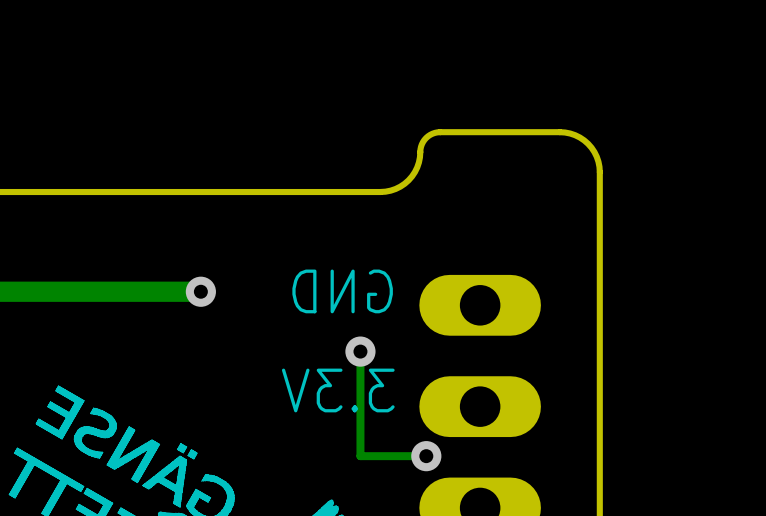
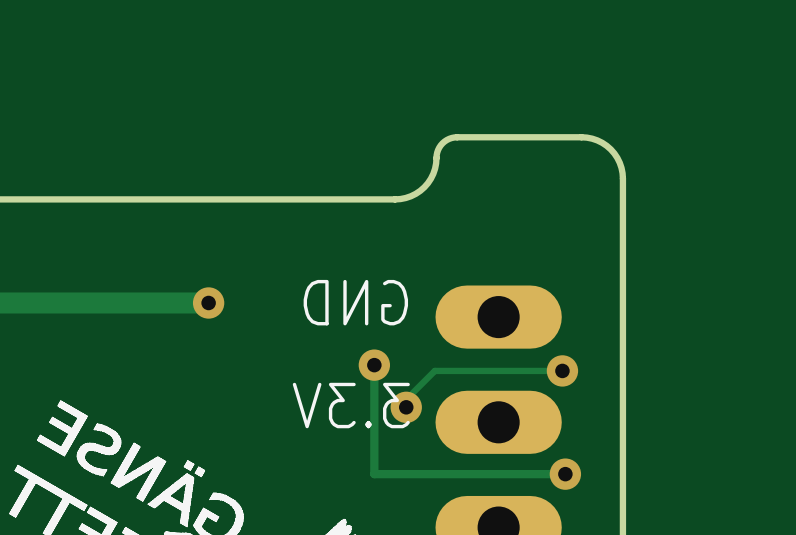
track: none -> (562, 370) (434, 370) (406, 399) (406, 407)
via: none -> (562, 370)
via: none -> (406, 407)
track: (426, 456) (360, 456) -> (565, 474) (374, 474)
via: (426, 456) -> none
via: none -> (565, 474)

